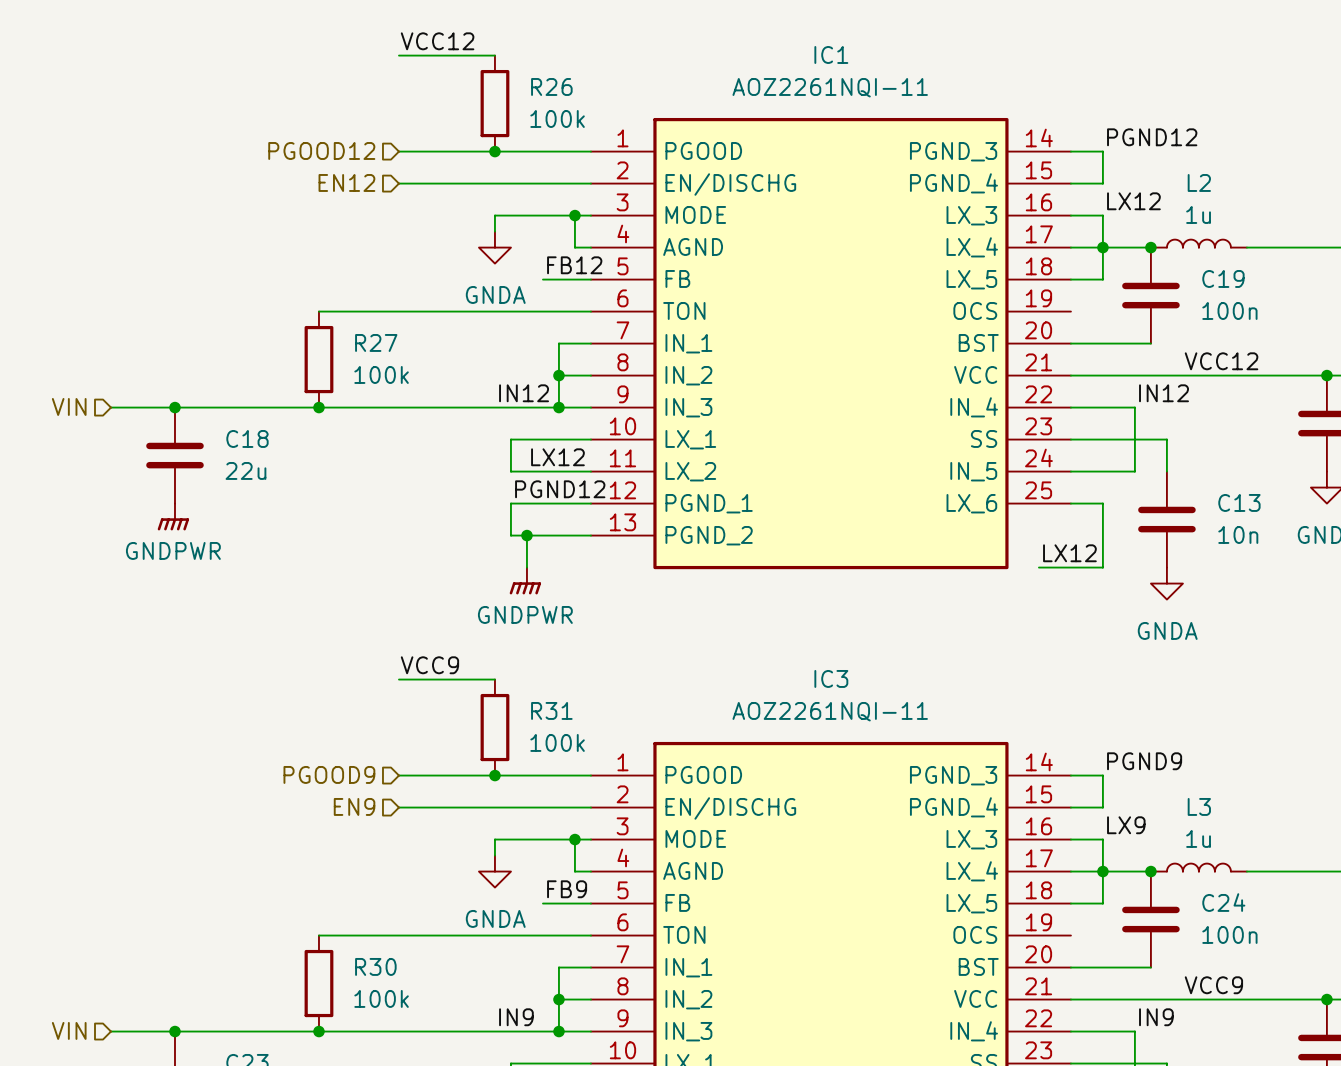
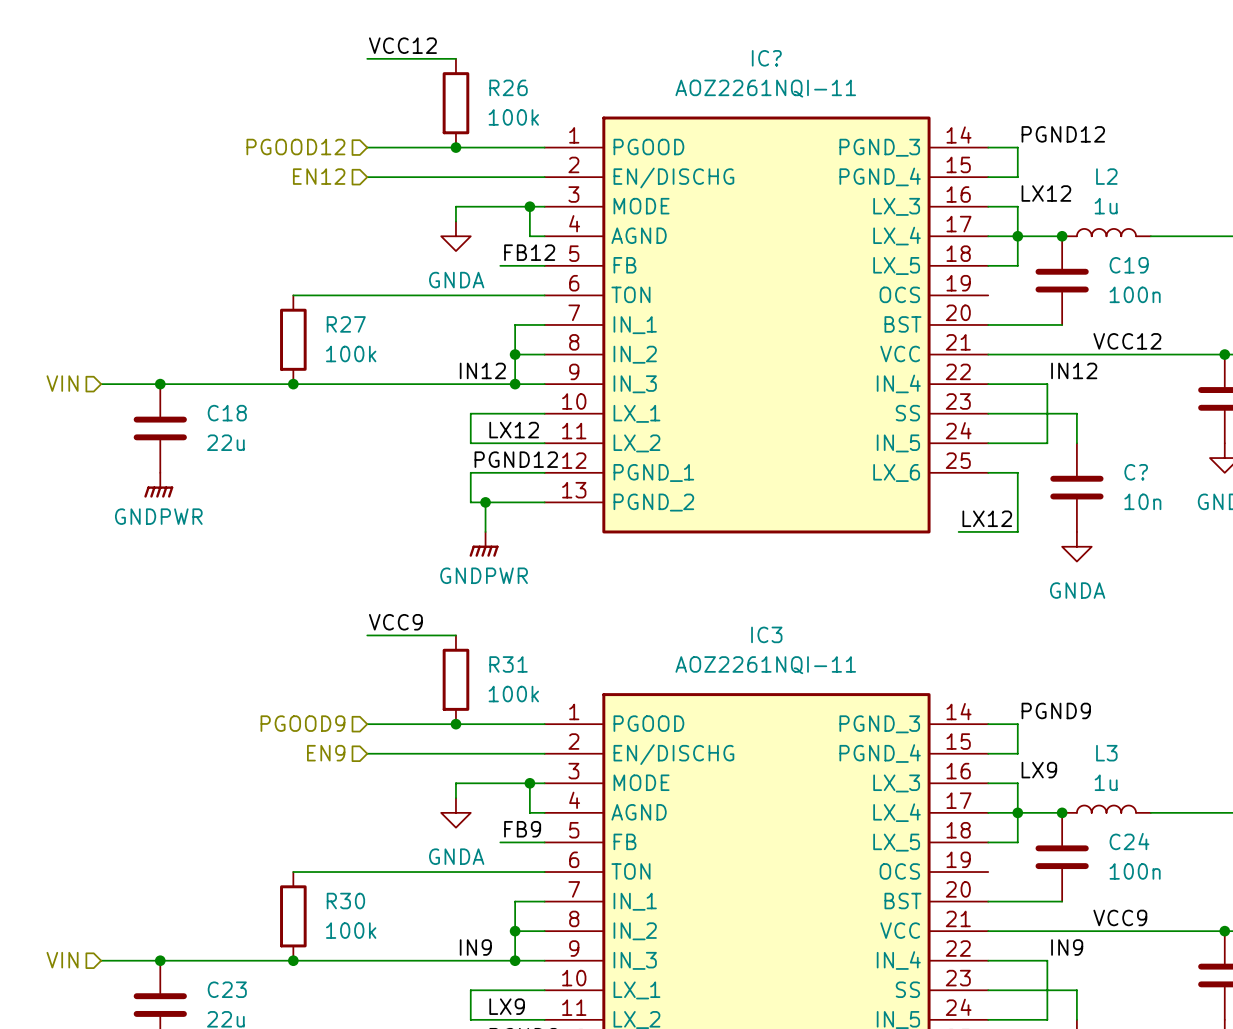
IC1 name: IC1 (831, 54) -> IC? (766, 58)
C13 name: C13 (1239, 502) -> C? (1136, 472)

